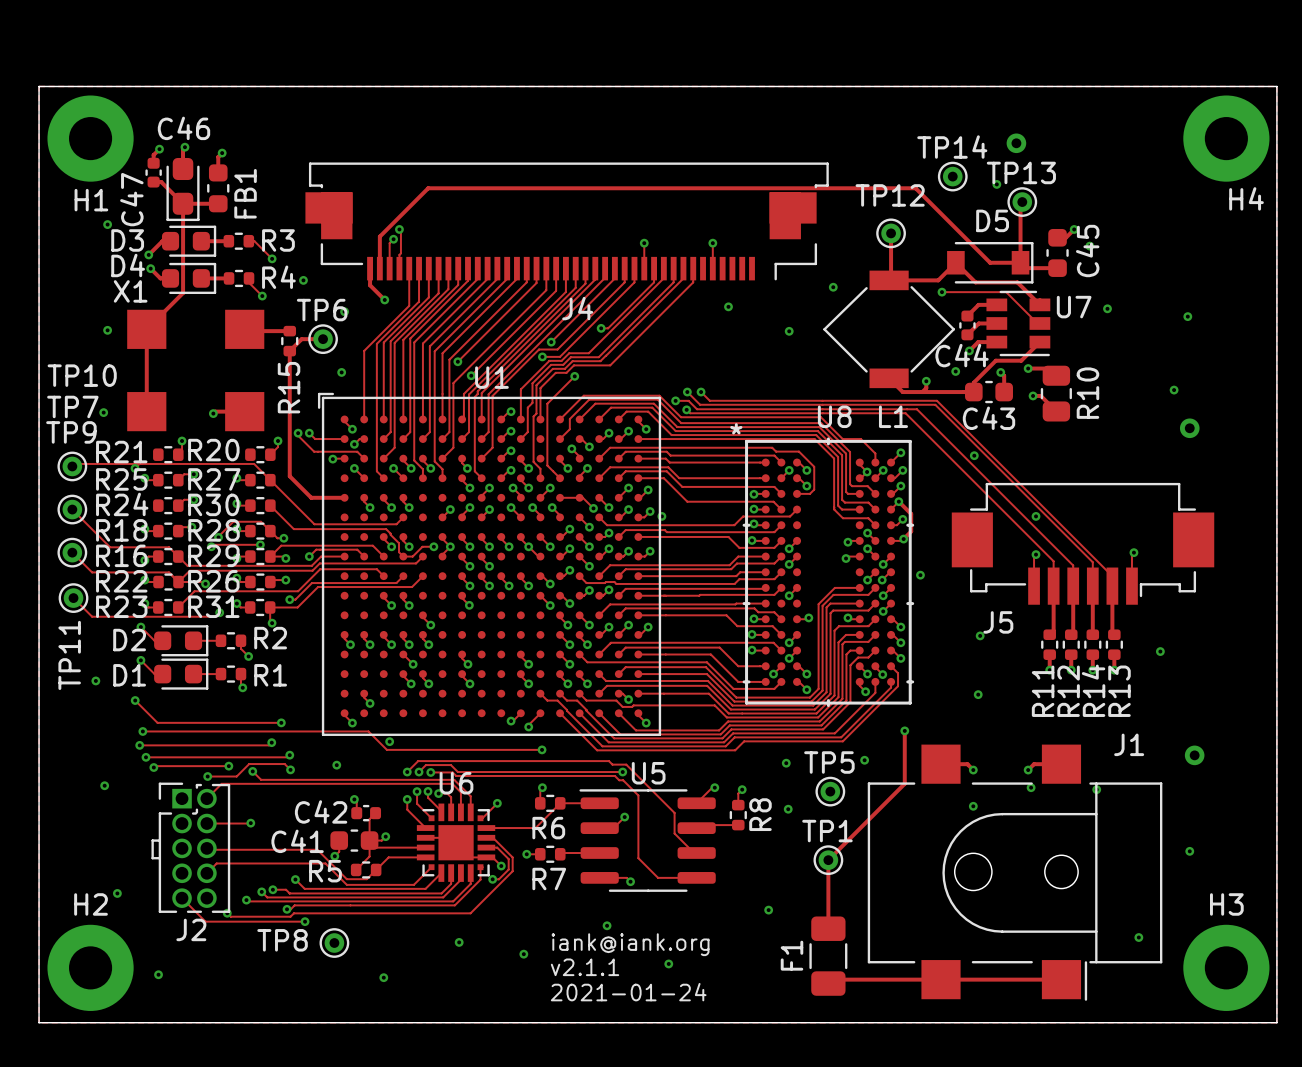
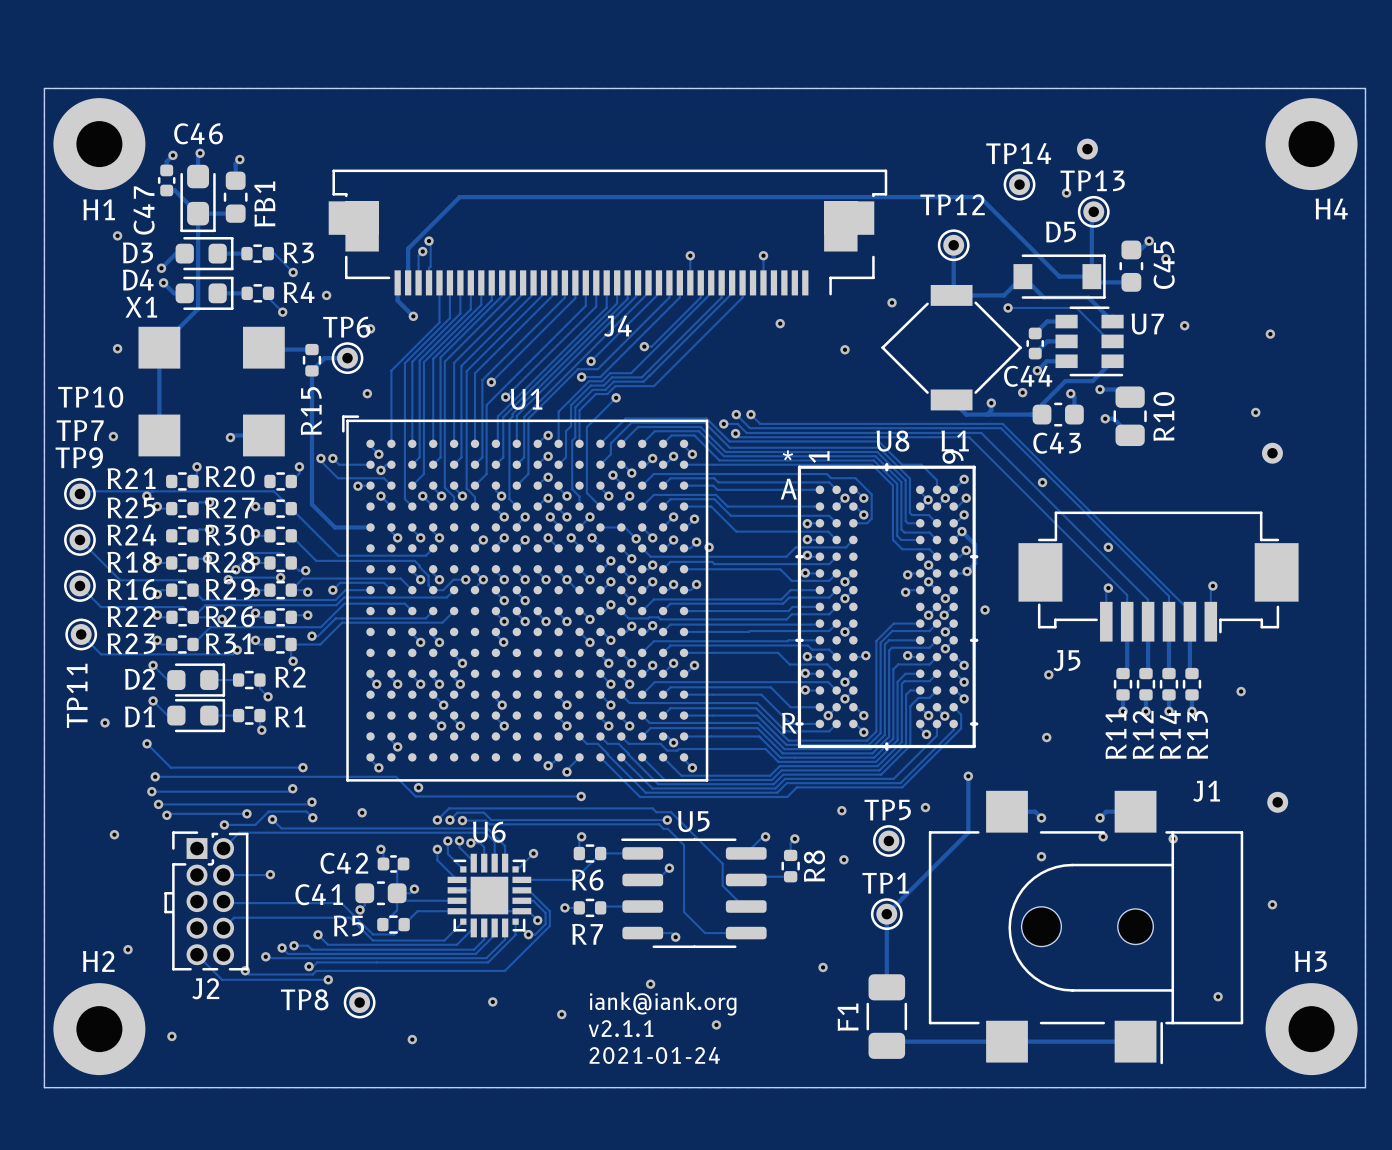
U8 text: none -> 1 (819, 456)
U8 text: none -> 9 (953, 456)
U8 text: none -> A (788, 489)
U8 text: none -> R (789, 723)

